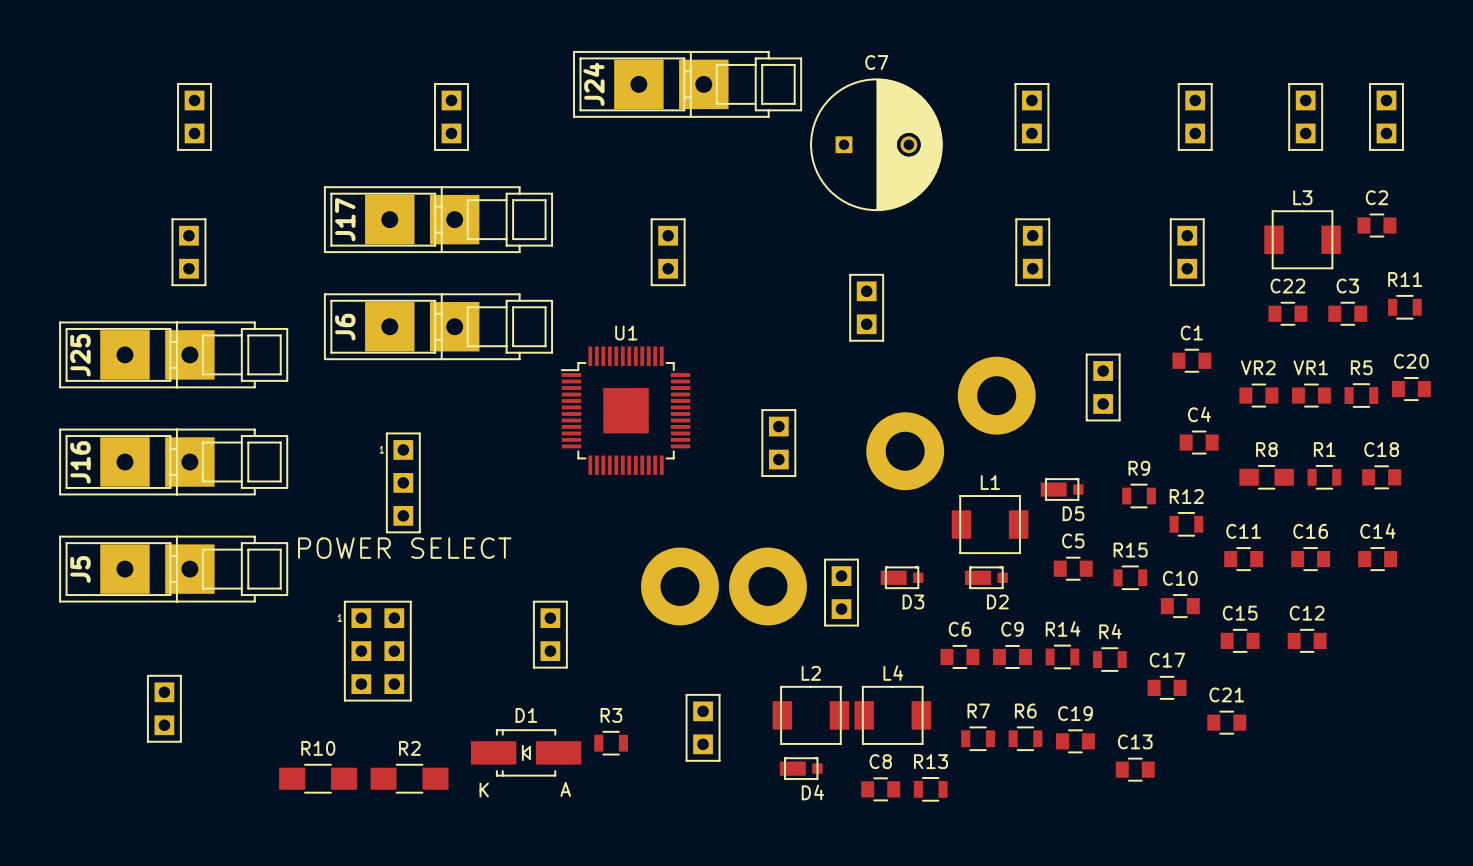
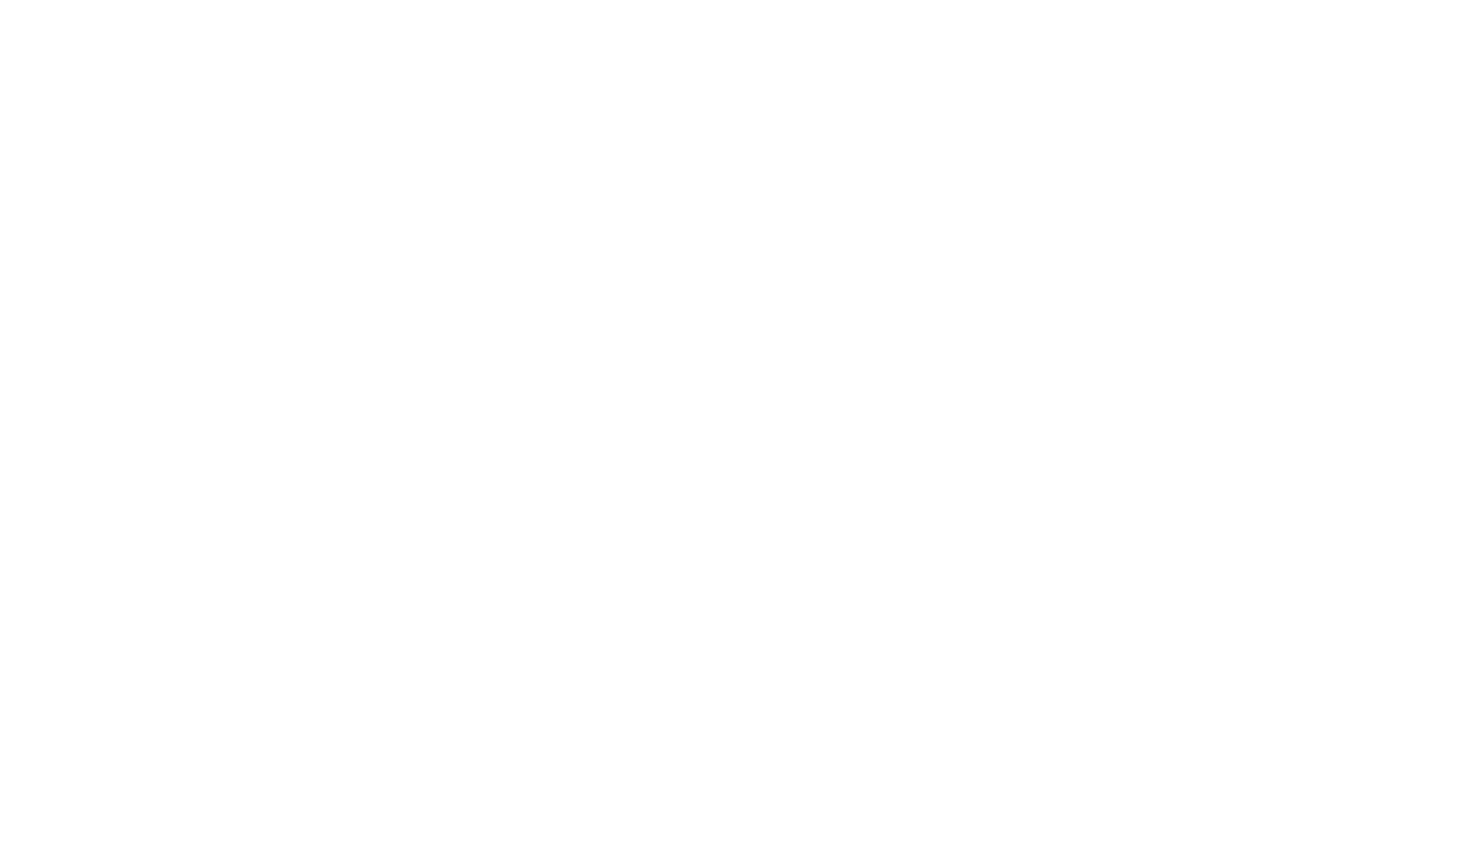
J24: (687, 84) -> none
part: (194, 116) -> none
part: (451, 116) -> none
part: (1031, 116) -> none
part: (1195, 116) -> none
part: (1305, 116) -> none
part: (1386, 116) -> none
C7: (876, 144) -> none
J17: (438, 219) -> none
C2: (1376, 225) -> none
L3: (1302, 239) -> none
part: (188, 252) -> none
part: (668, 252) -> none
part: (1032, 252) -> none
part: (1187, 252) -> none
part: (866, 307) -> none
R11: (1404, 307) -> none
C22: (1287, 313) -> none
C3: (1347, 313) -> none
J6: (438, 326) -> none
J25: (173, 354) -> none
C1: (1191, 360) -> none
part: (1103, 387) -> none
C20: (1411, 389) -> none
part: (996, 395) -> none
VR2: (1258, 395) -> none
VR1: (1311, 395) -> none
R5: (1361, 395) -> none
U1: (625, 410) -> none
C4: (1199, 442) -> none
part: (778, 443) -> none
part: (905, 451) -> none
J16: (173, 462) -> none
R8: (1266, 477) -> none
R1: (1324, 477) -> none
C18: (1381, 477) -> none
part: POWER SELECT (403, 482) -> none
D5: (1062, 489) -> none
R9: (1139, 496) -> none
L1: (990, 524) -> none
R12: (1186, 524) -> none
C11: (1243, 559) -> none
C16: (1310, 559) -> none
C14: (1377, 559) -> none
C5: (1073, 568) -> none
J5: (173, 569) -> none
D3: (902, 577) -> none
D2: (986, 577) -> none
R15: (1130, 577) -> none
part: (679, 586) -> none
part: (767, 586) -> none
part: (841, 592) -> none
C10: (1180, 606) -> none
part: (550, 634) -> none
C15: (1240, 640) -> none
C12: (1307, 640) -> none
part: (377, 651) -> none
C6: (959, 656) -> none
C9: (1012, 656) -> none
R14: (1062, 656) -> none
R4: (1109, 659) -> none
C17: (1167, 687) -> none
part: (164, 708) -> none
L2: (810, 715) -> none
L4: (892, 715) -> none
C21: (1226, 722) -> none
part: (703, 727) -> none
R7: (978, 738) -> none
R6: (1025, 738) -> none
C19: (1075, 741) -> none
R3: (611, 743) -> none
D1: (526, 752) -> none
D4: (801, 768) -> none
C13: (1135, 769) -> none
R10: (318, 778) -> none
R2: (409, 778) -> none
C8: (880, 789) -> none
R13: (930, 789) -> none

